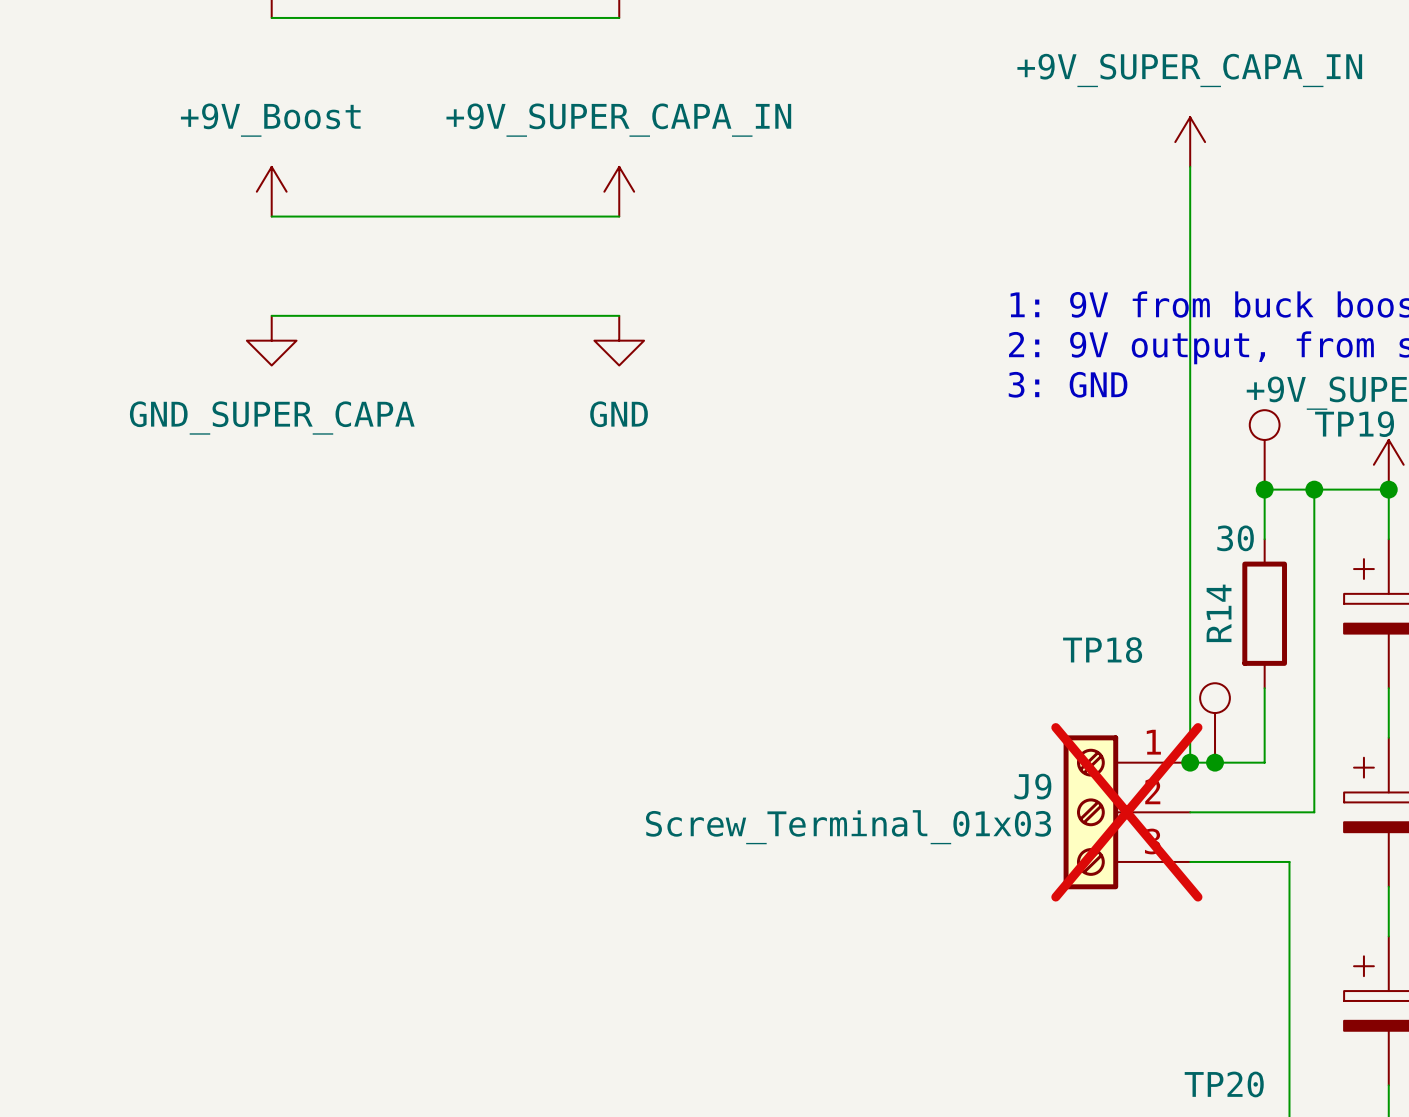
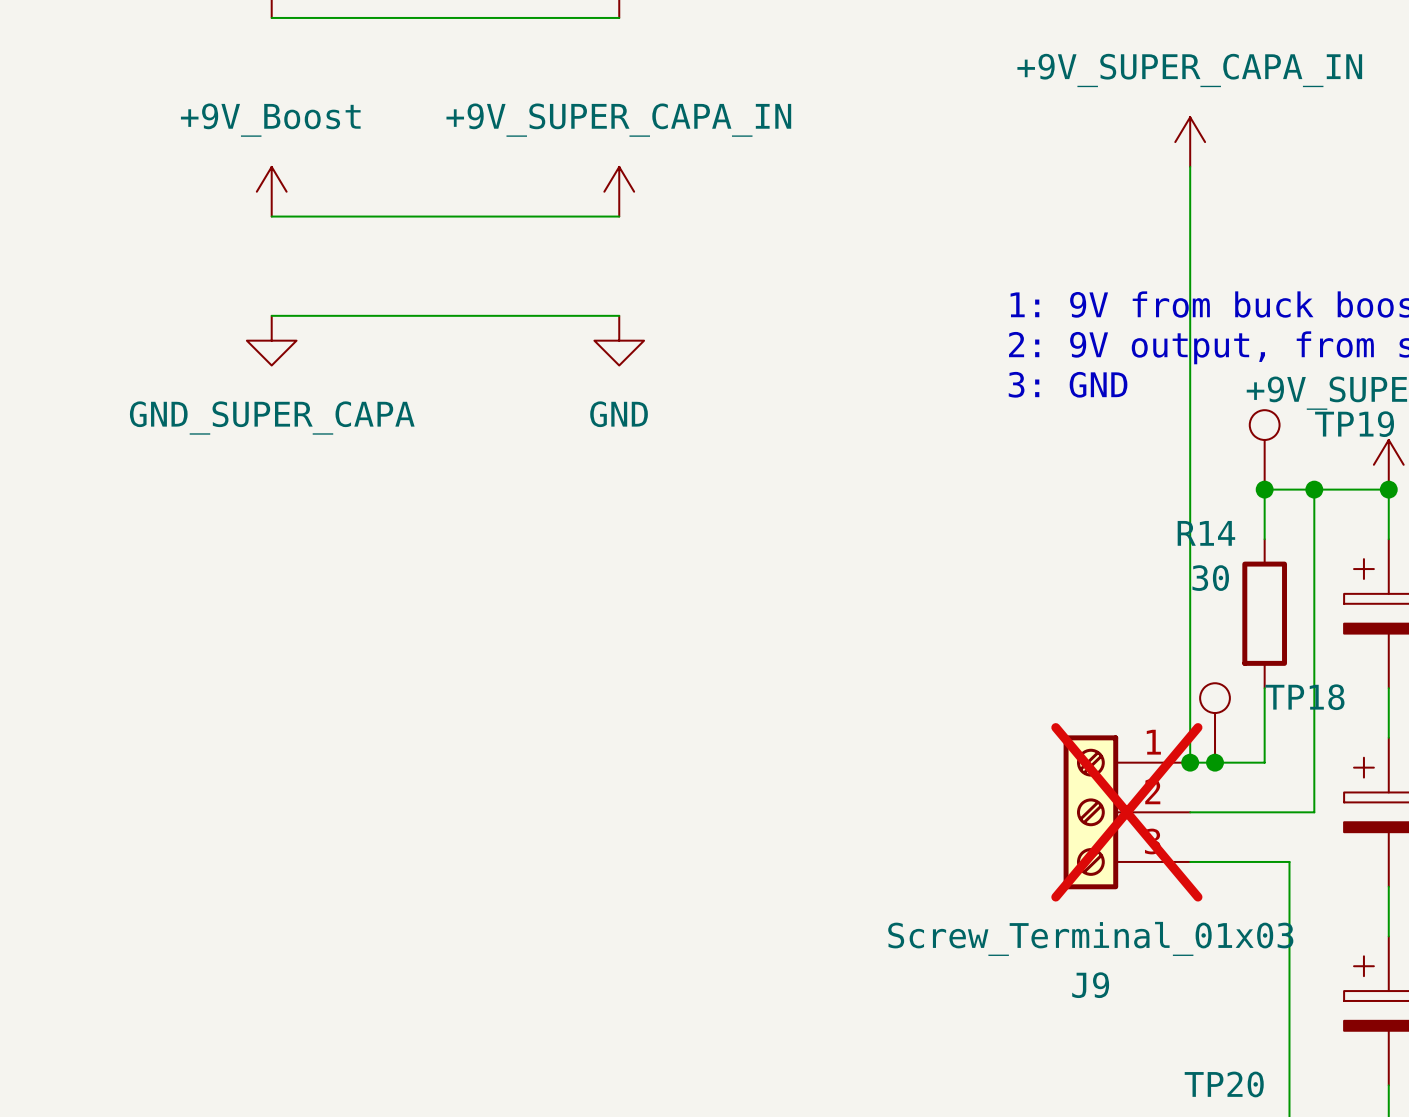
R14 value position: 30 (1235, 538) -> 30 (1210, 578)
R14 name rotation: 0° (1219, 613) -> 90° clockwise (1206, 533)
TP18 name position: TP18 (1102, 650) -> TP18 (1304, 697)
J9 name position: J9 (1032, 786) -> J9 (1090, 985)
J9 value position: Screw_Terminal_01x03 (848, 827) -> Screw_Terminal_01x03 (1090, 938)

